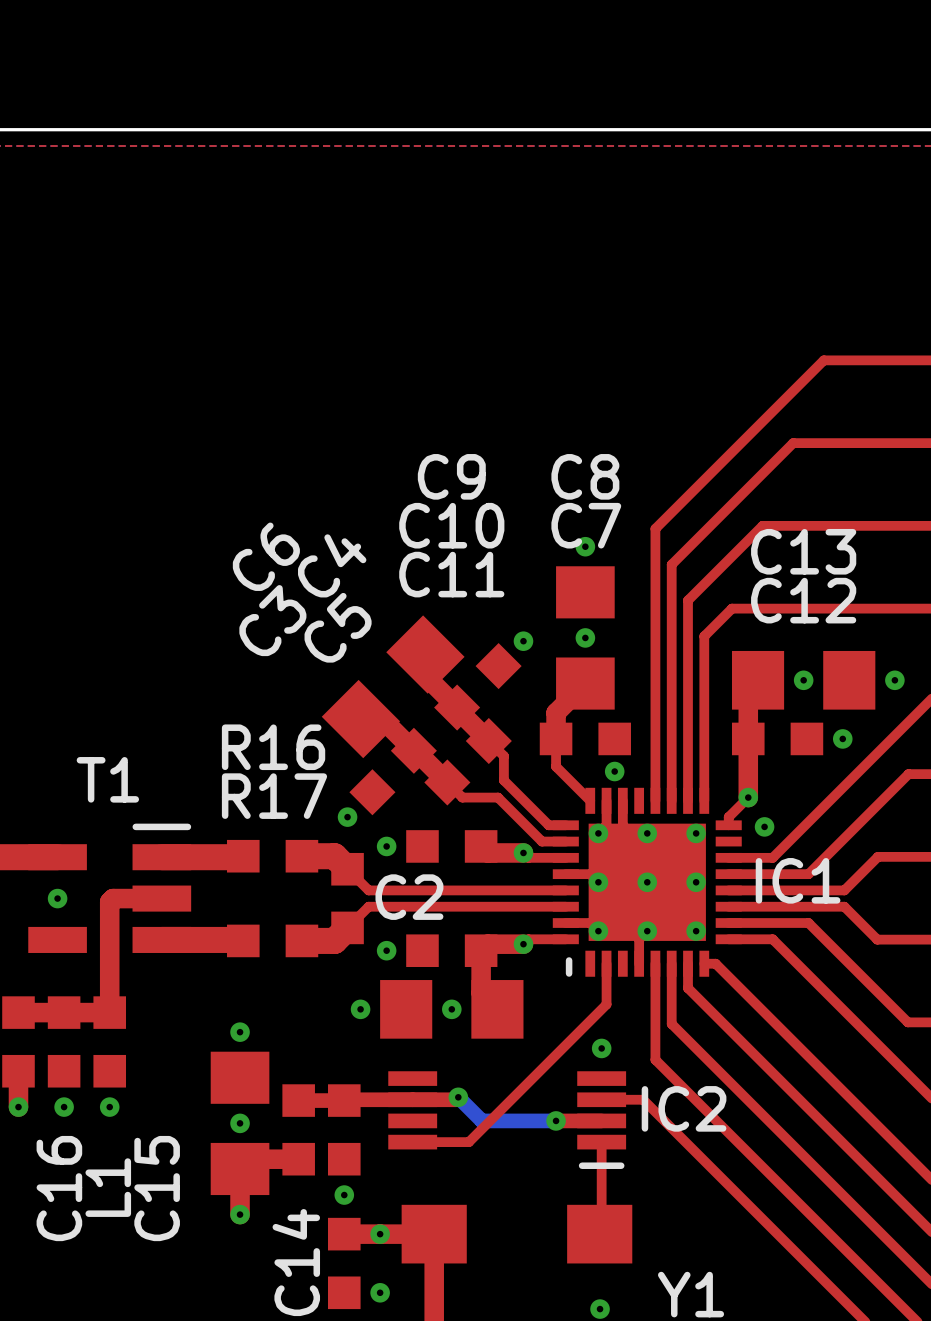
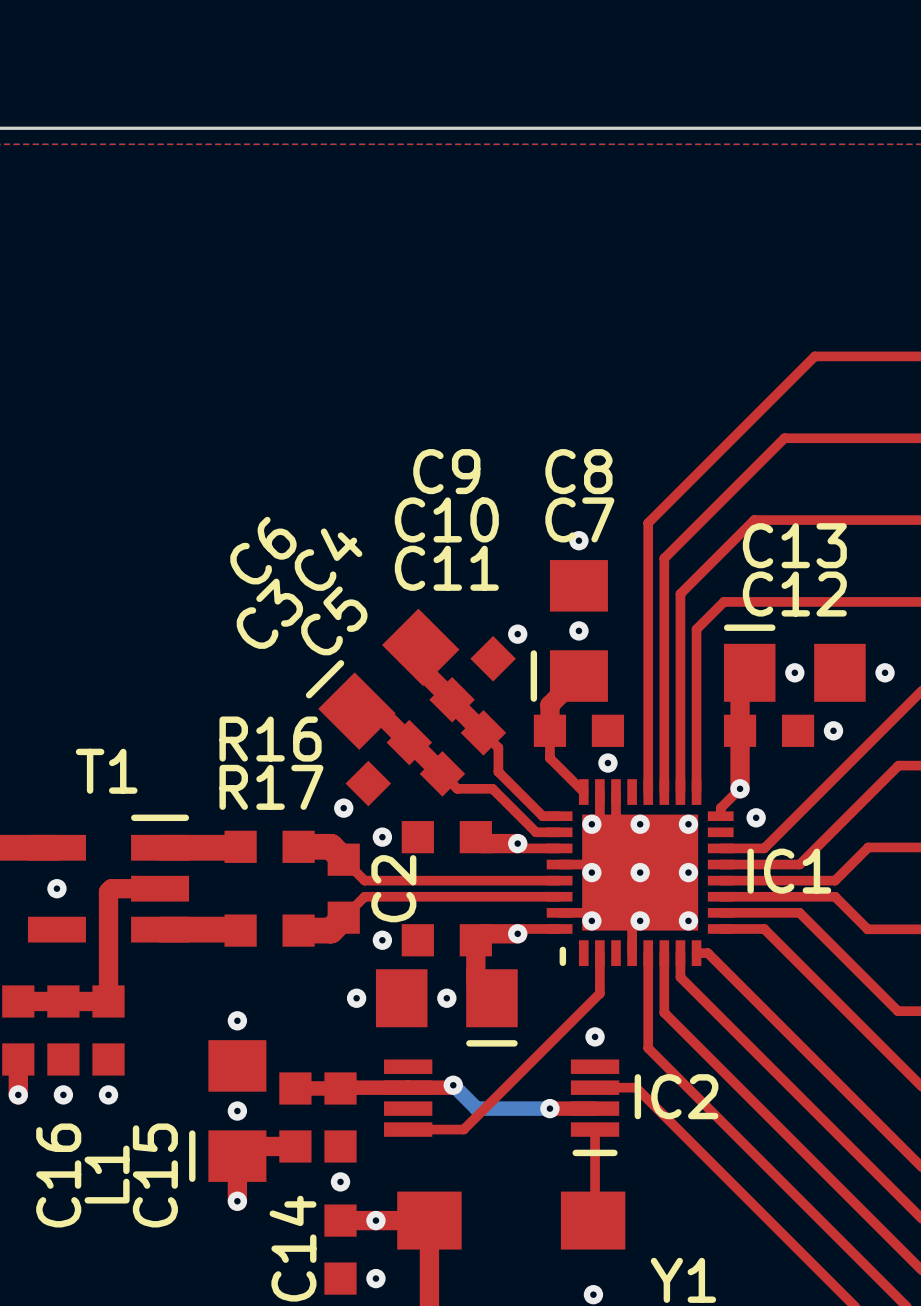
C8 footprint: [556, 566, 615, 710] -> [530, 560, 608, 702]
C6 footprint: [321, 615, 465, 759] -> [305, 608, 460, 750]
C13 footprint: [731, 650, 876, 710] -> [723, 624, 866, 702]
C2 name rotation: 0° (409, 897) -> 90° counterclockwise (393, 888)
C11 footprint: [380, 980, 524, 1039] -> [375, 969, 518, 1047]
C16 footprint: [210, 1051, 270, 1196] -> [189, 1040, 267, 1182]

